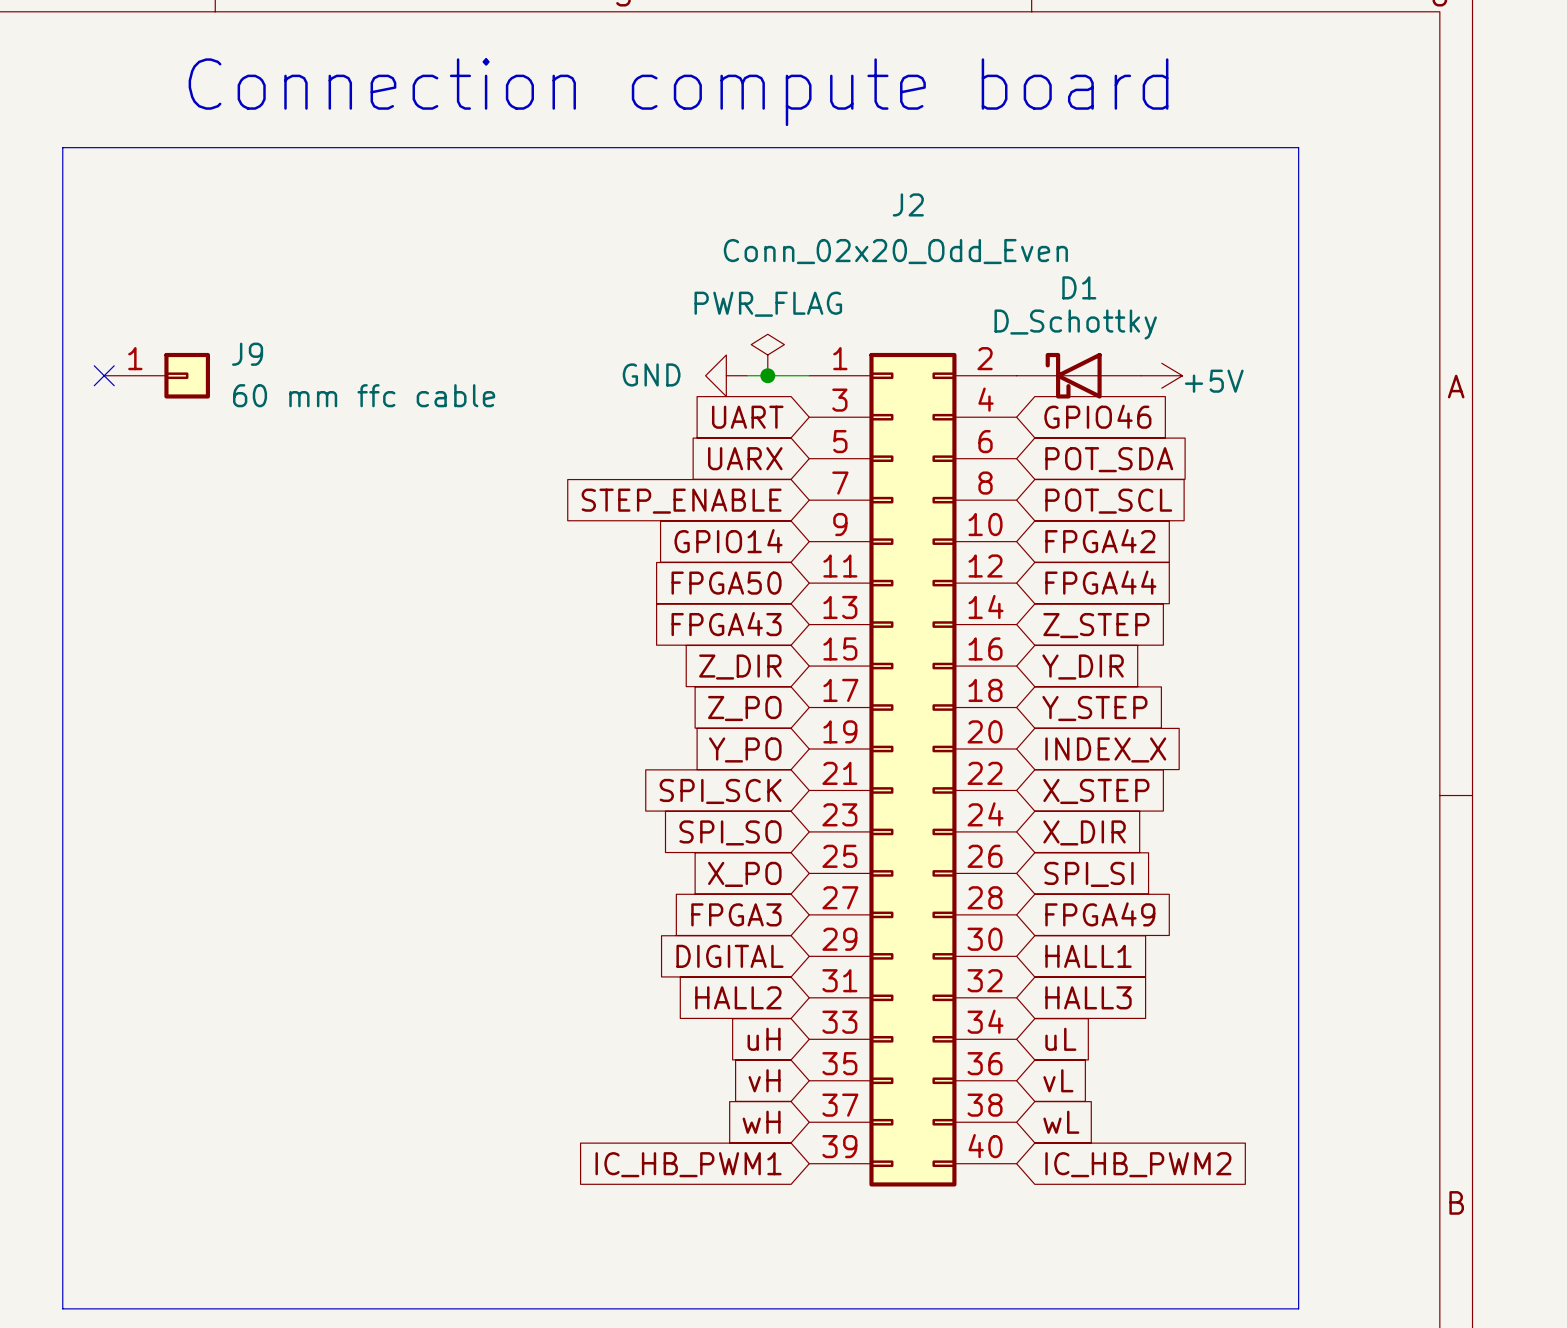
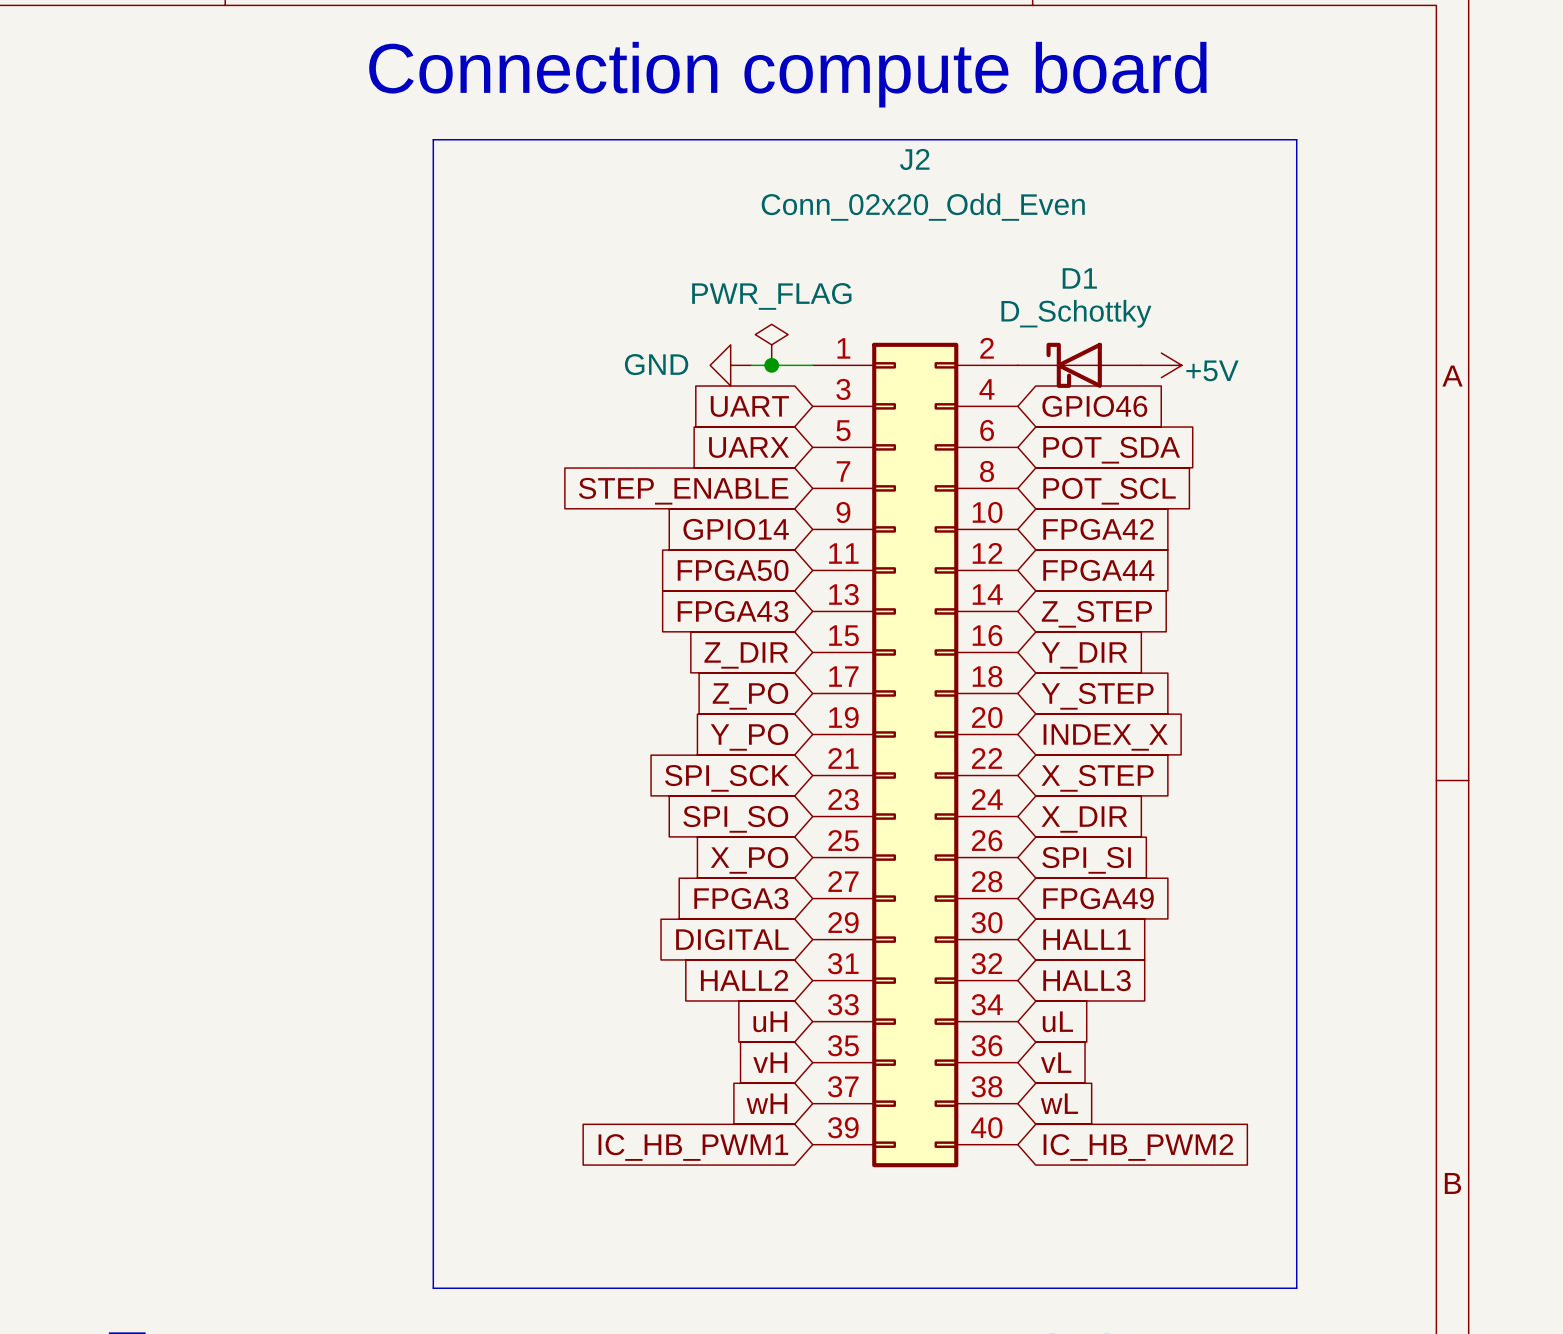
text position: Connection compute board (678, 92) -> Connection compute board (787, 74)
line: (425, 147) (62, 147) (62, 1308) (425, 1308) -> (433, 139) (433, 1288)
J2 name position: J2 (908, 204) -> J2 (914, 159)
J2 value position: Conn_02x20_Odd_Even (895, 251) -> Conn_02x20_Odd_Even (923, 207)
no-connect mark: (104, 375) -> none
J9: 60 mm ffc cable (157, 375) -> none

